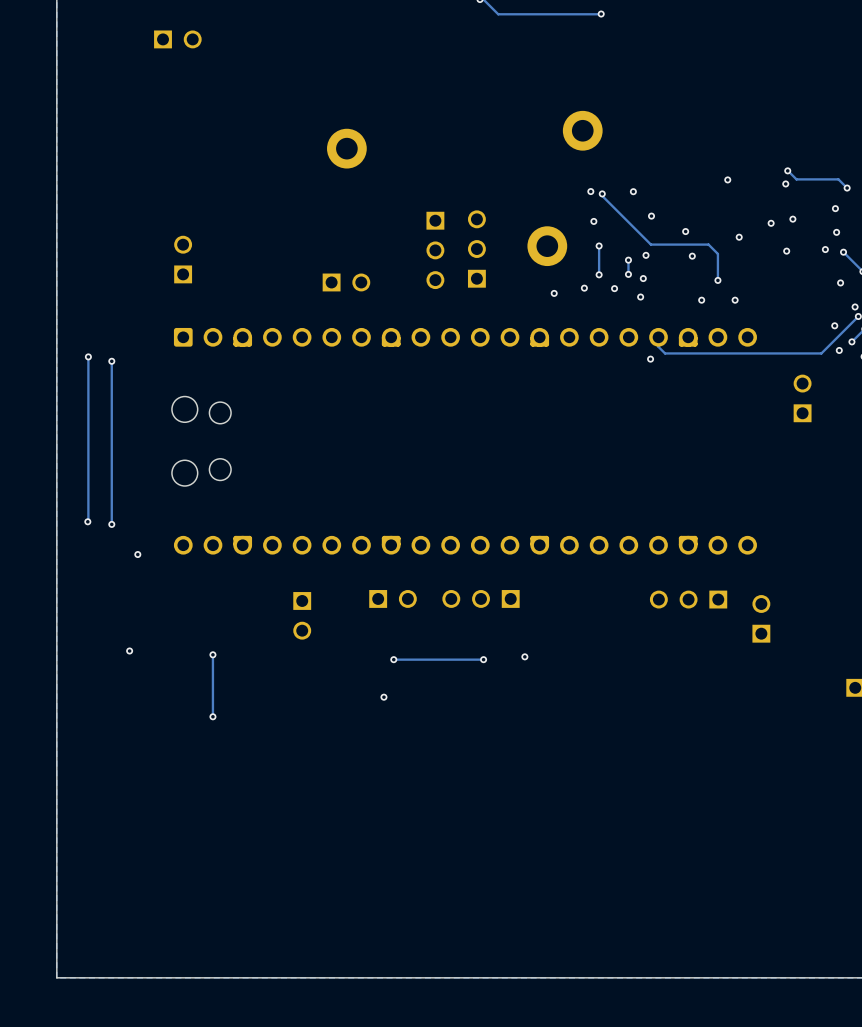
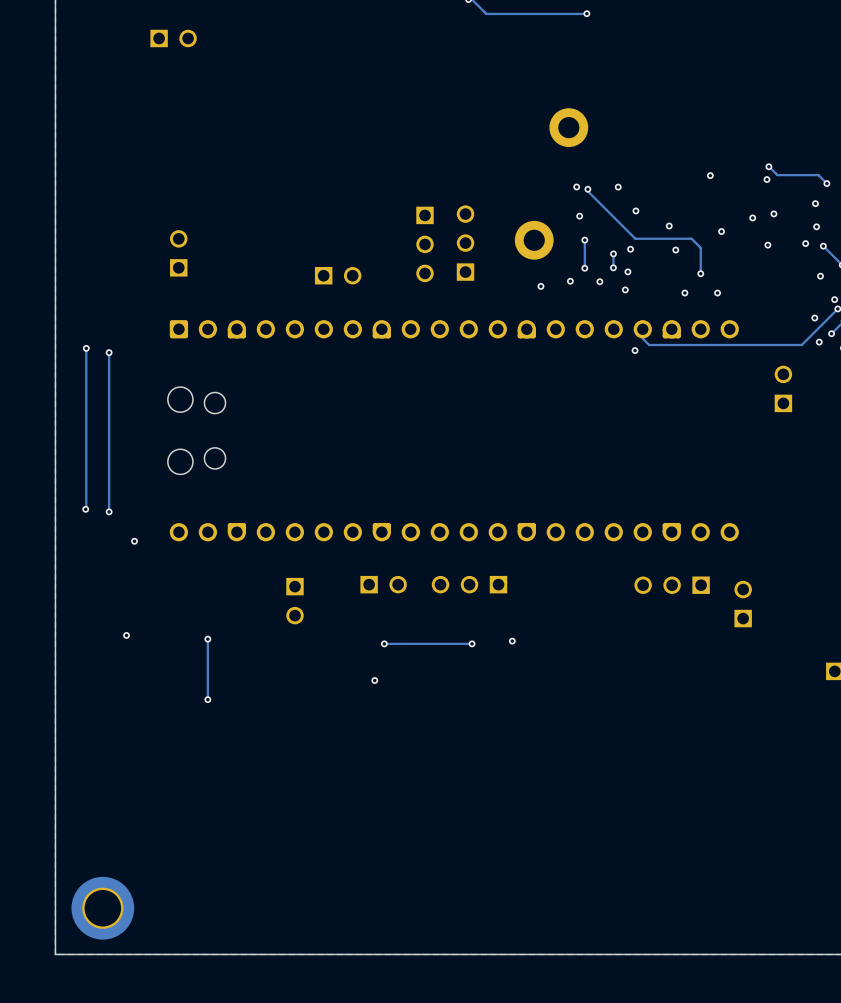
part: (346, 148) -> none
part: none -> (102, 908)

